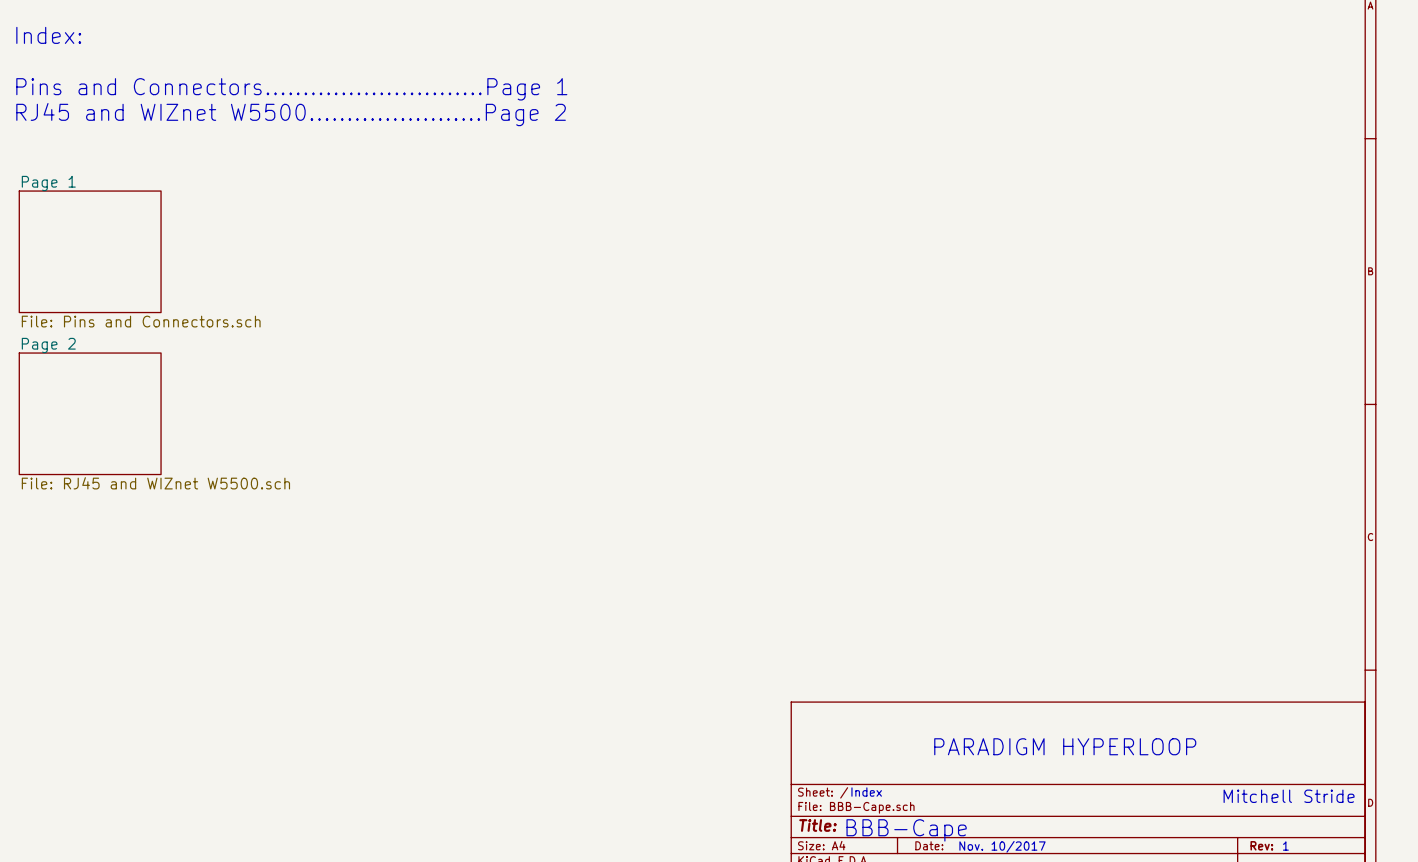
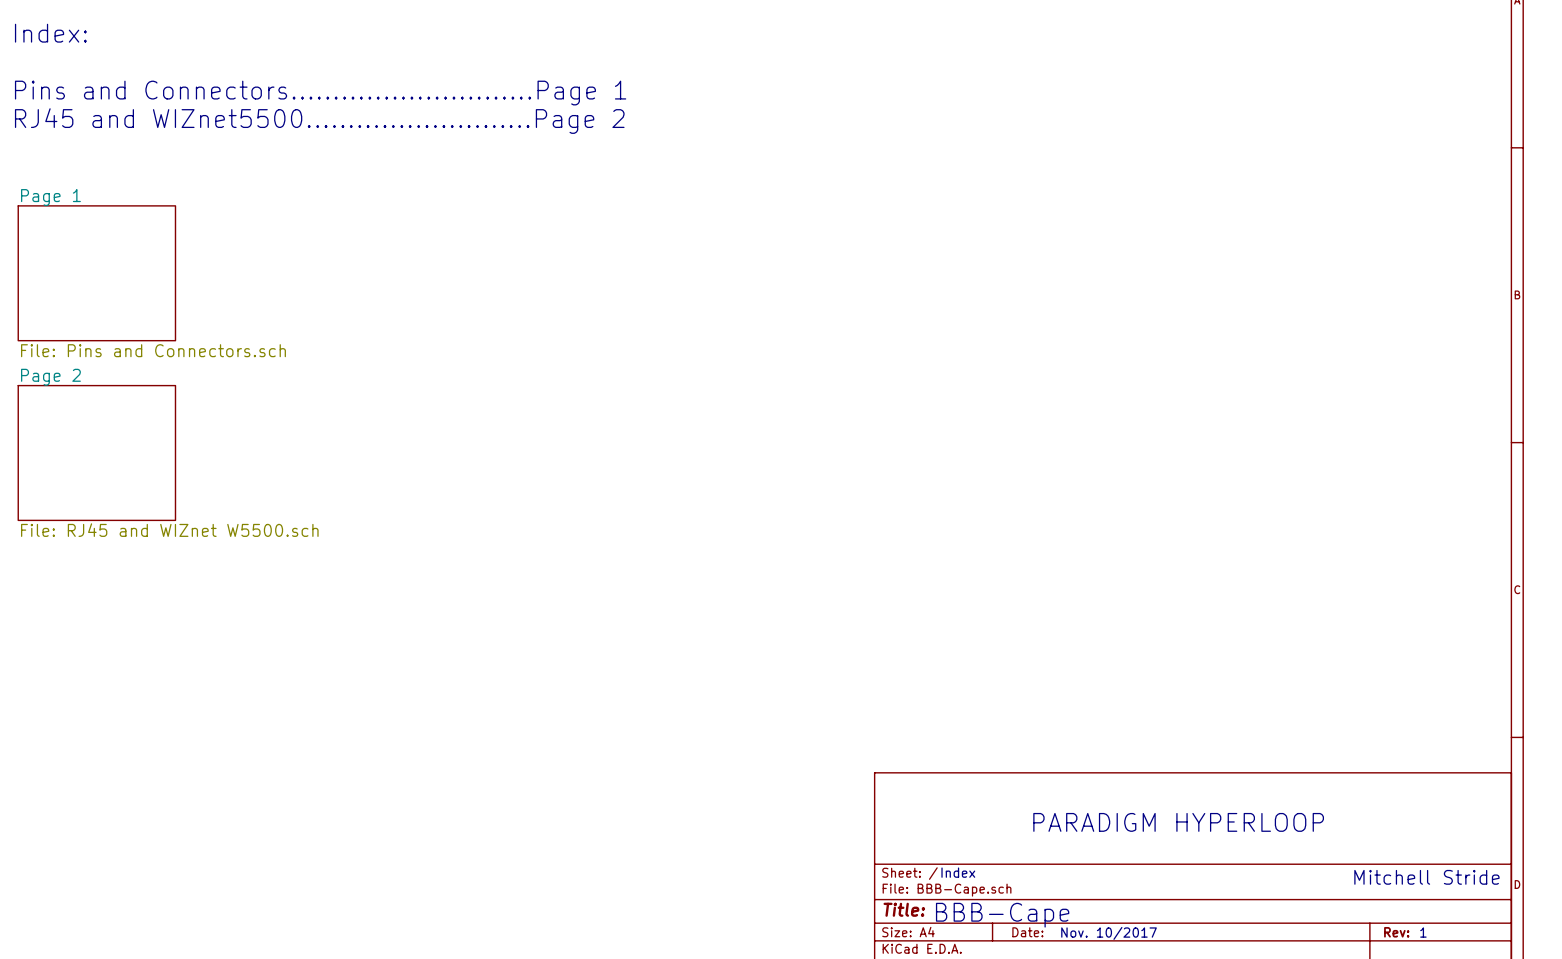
text: RJ45 and WIZnet W5500.......................Page 2 (291, 114) -> RJ45 and WIZnet5500...........................Page 2 (319, 121)

